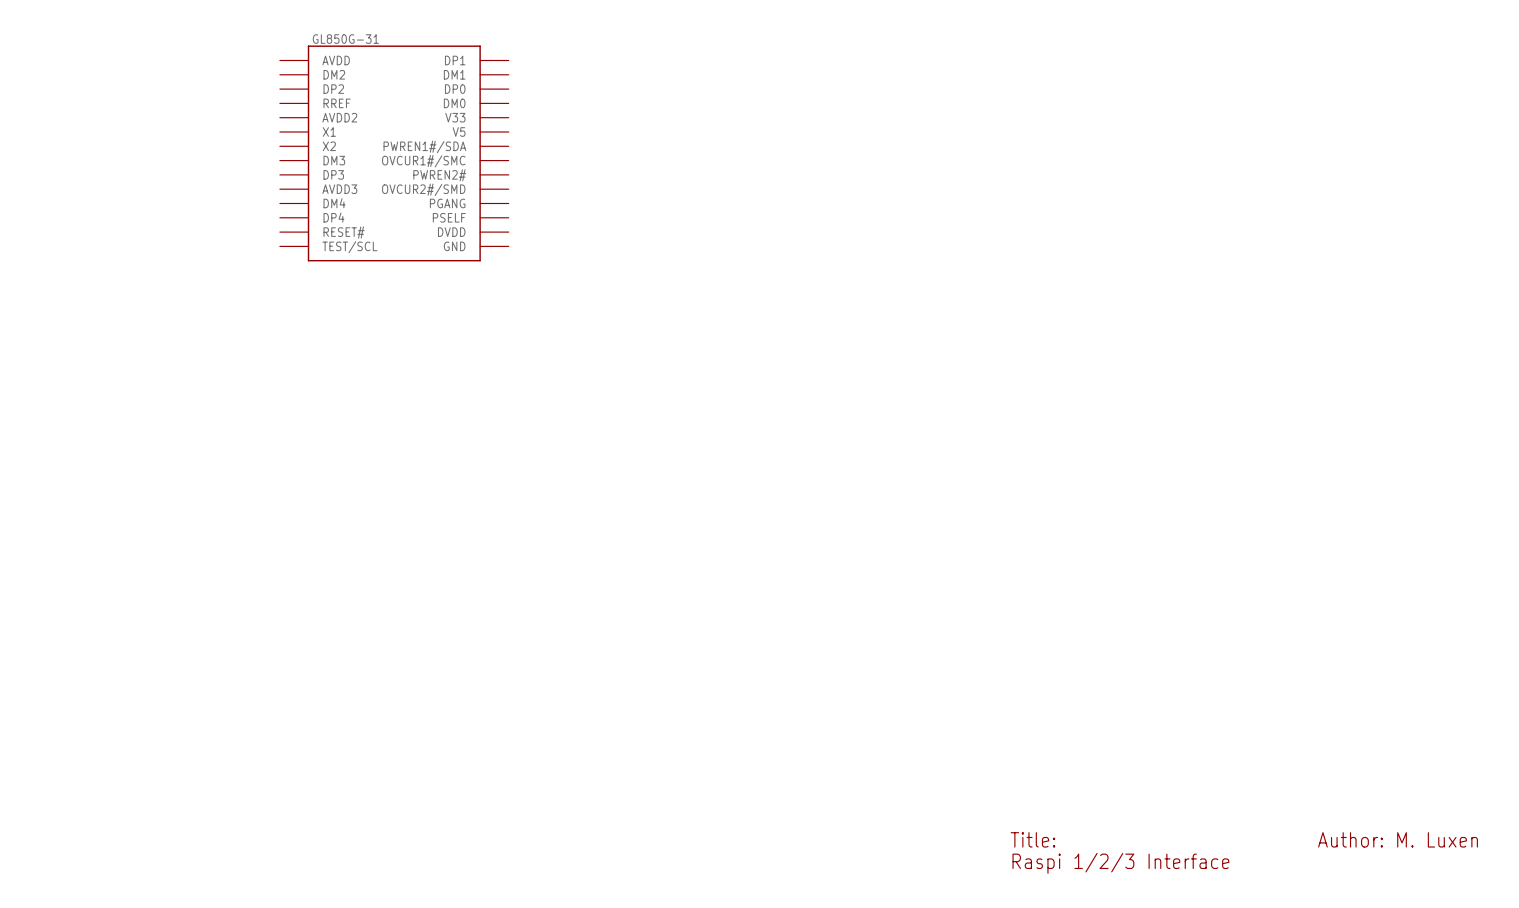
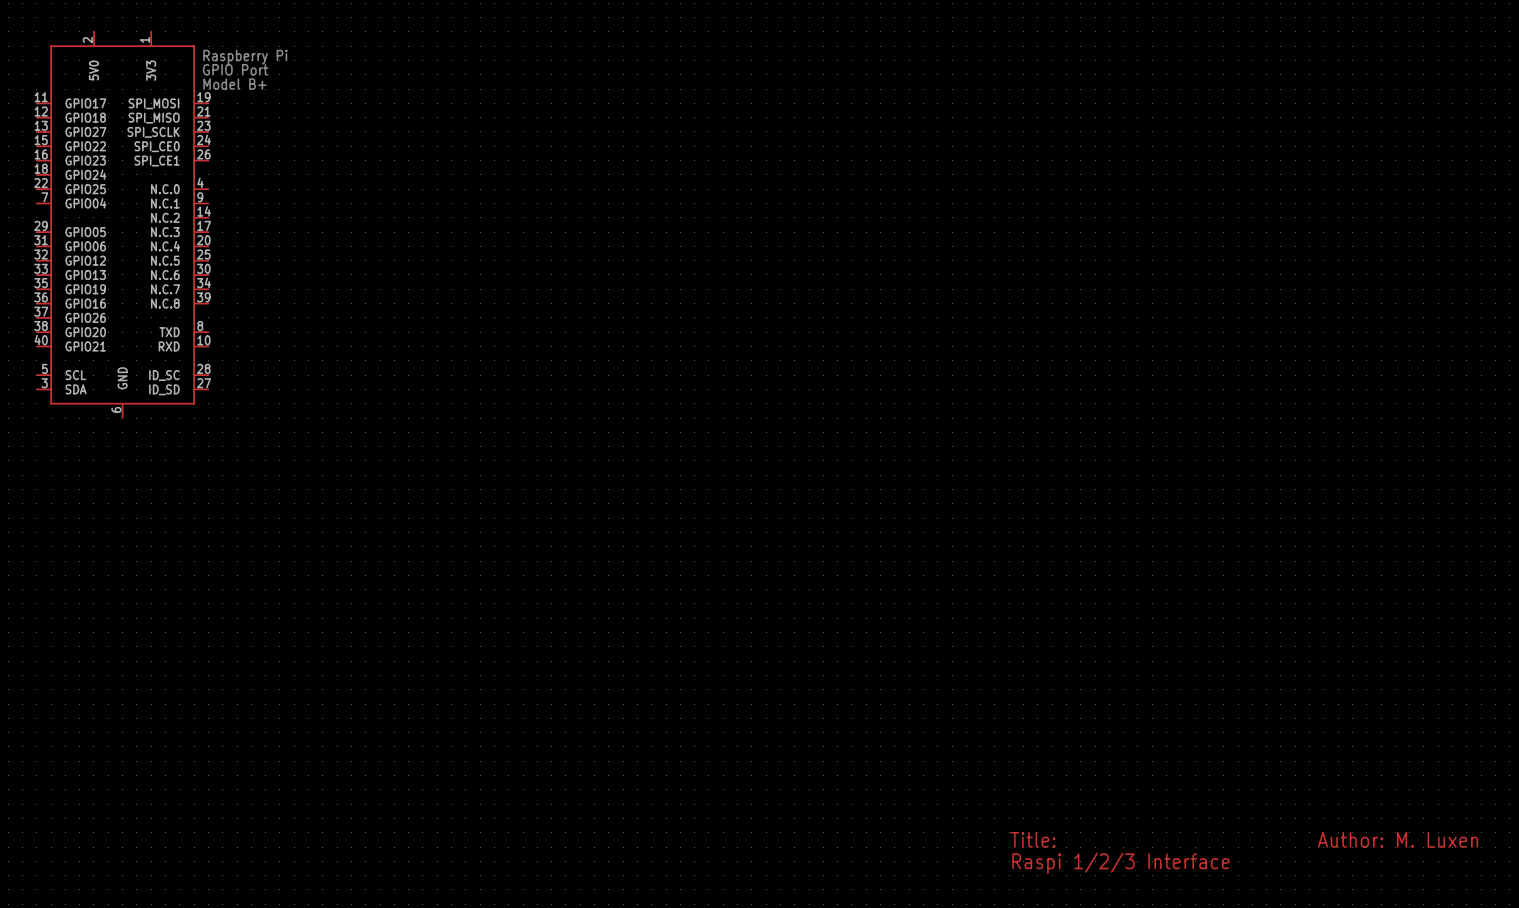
part: (394, 153) -> none
part: none -> (122, 224)

